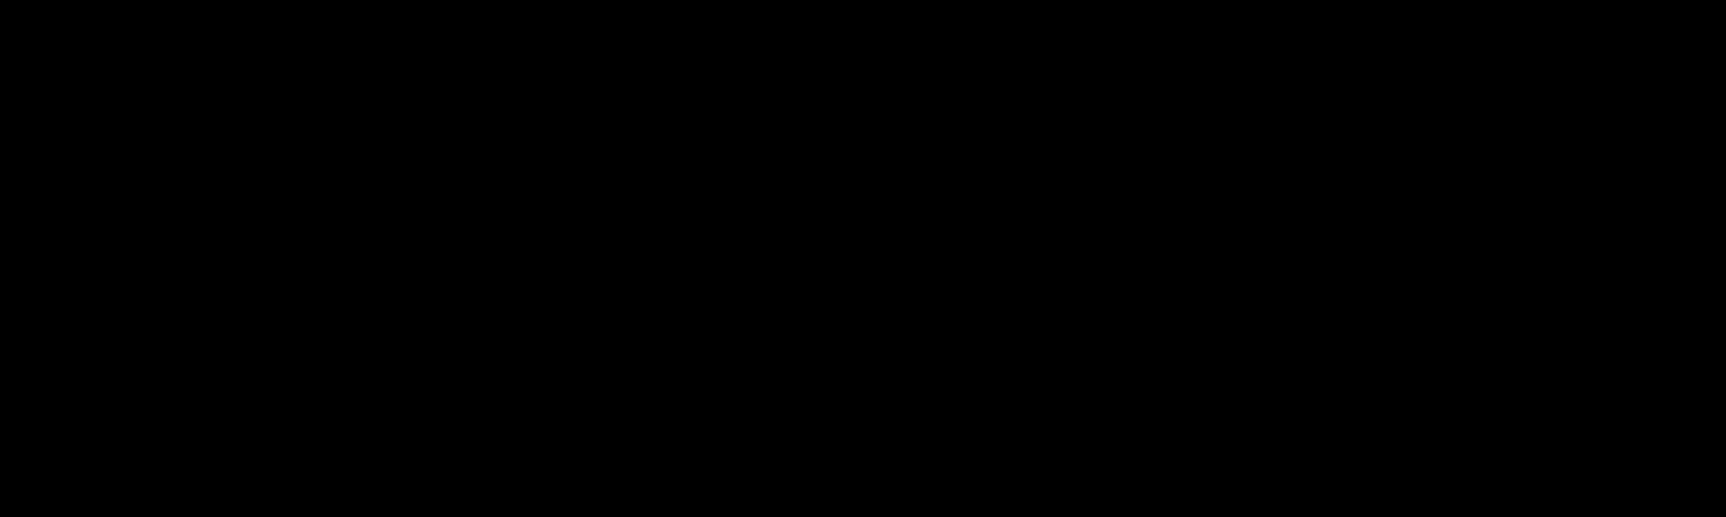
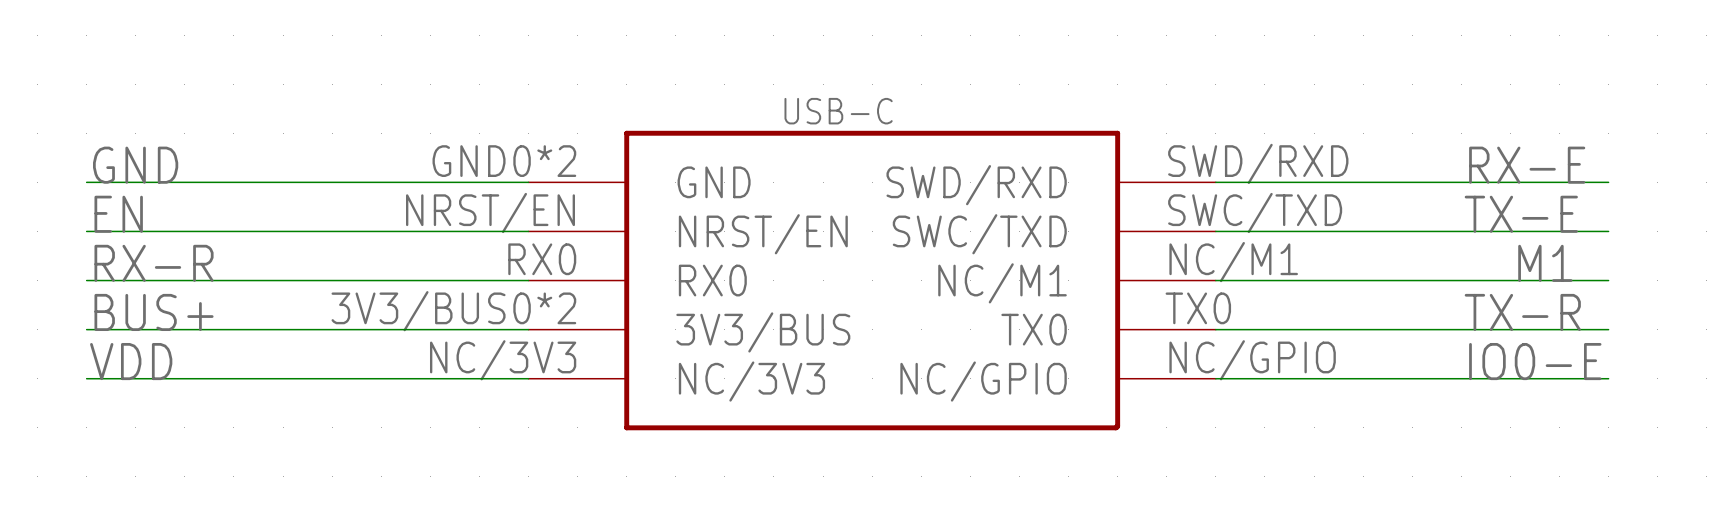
label: none -> GND (135, 165)
label: none -> RX-E (1527, 165)
wire: none -> (86, 182) (528, 182)
wire: none -> (1215, 182) (1608, 182)
label: none -> EN (118, 214)
label: none -> TX-E (1521, 214)
wire: none -> (86, 231) (528, 231)
wire: none -> (1215, 231) (1608, 231)
label: none -> RX-R (154, 263)
label: none -> M1 (1545, 263)
wire: none -> (86, 280) (528, 280)
part: none -> (872, 280)
wire: none -> (1215, 280) (1608, 280)
label: none -> BUS+ (154, 312)
label: none -> TX-R (1522, 312)
wire: none -> (86, 329) (528, 329)
wire: none -> (1215, 329) (1608, 329)
label: none -> VDD (131, 361)
label: none -> IO0-E (1535, 361)
wire: none -> (86, 378) (528, 378)
wire: none -> (1215, 378) (1608, 378)

